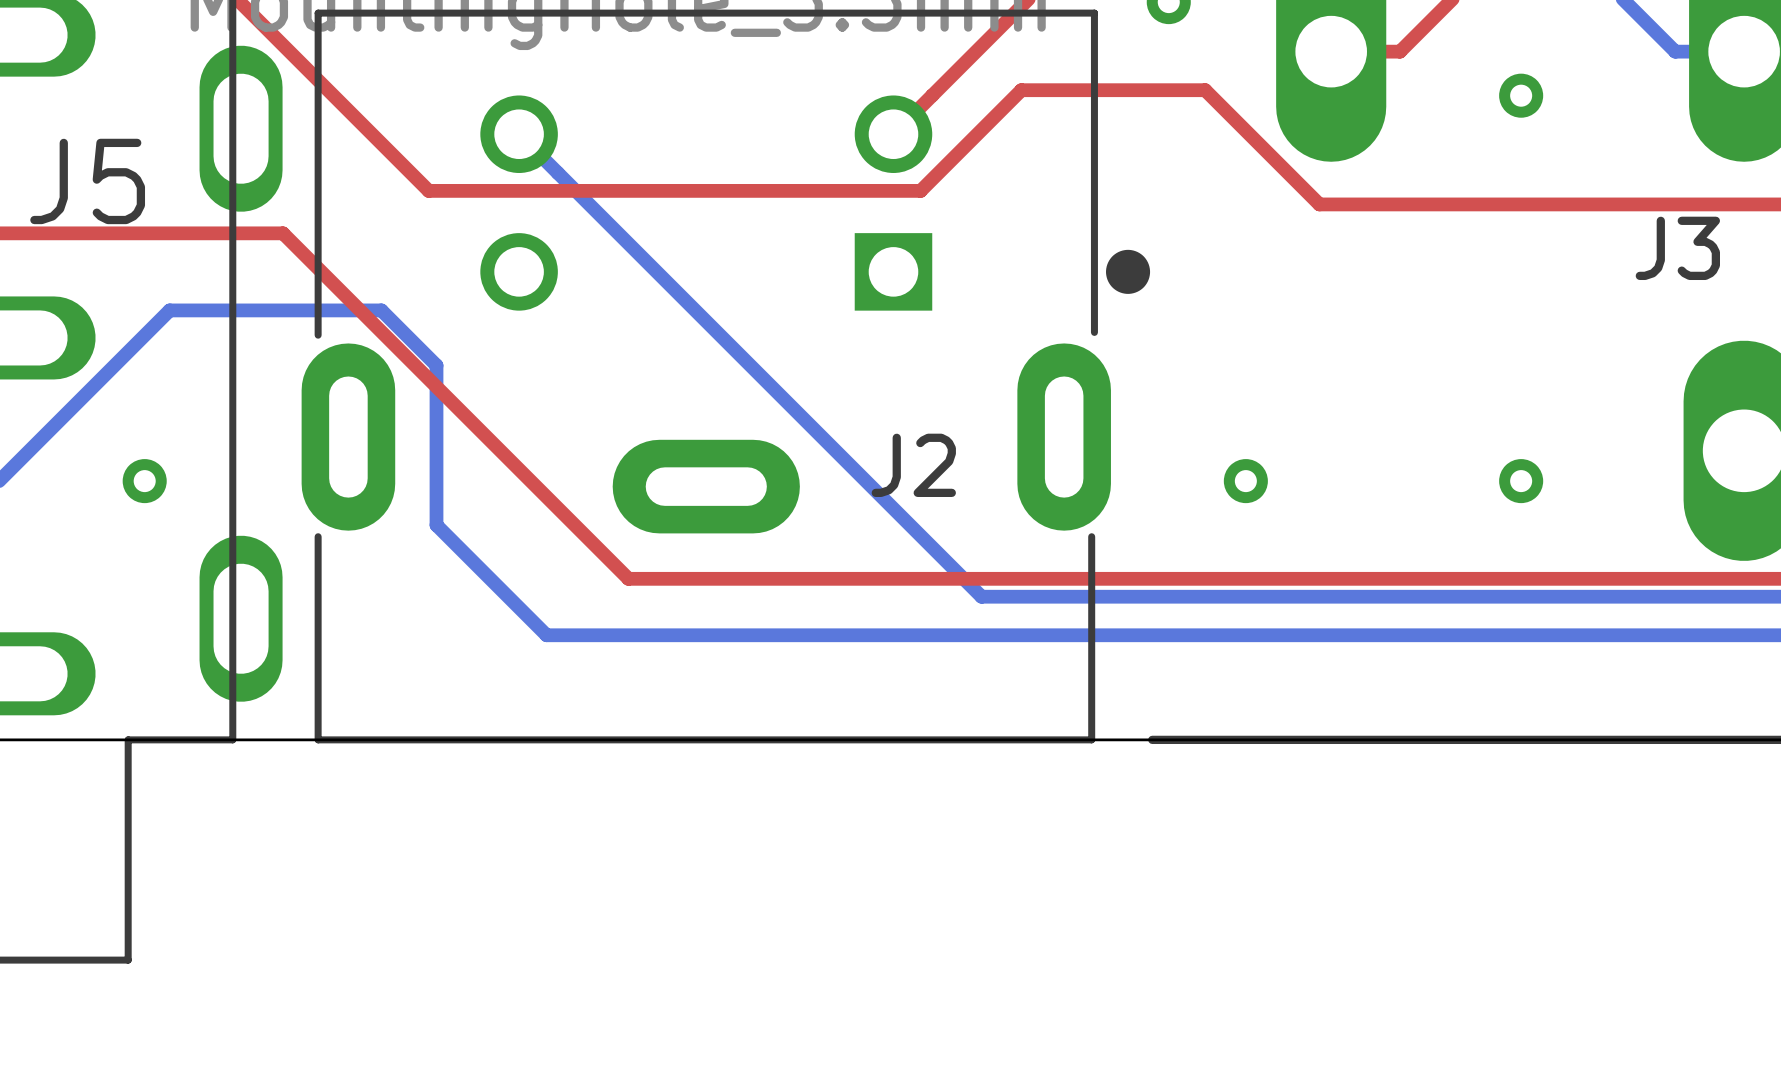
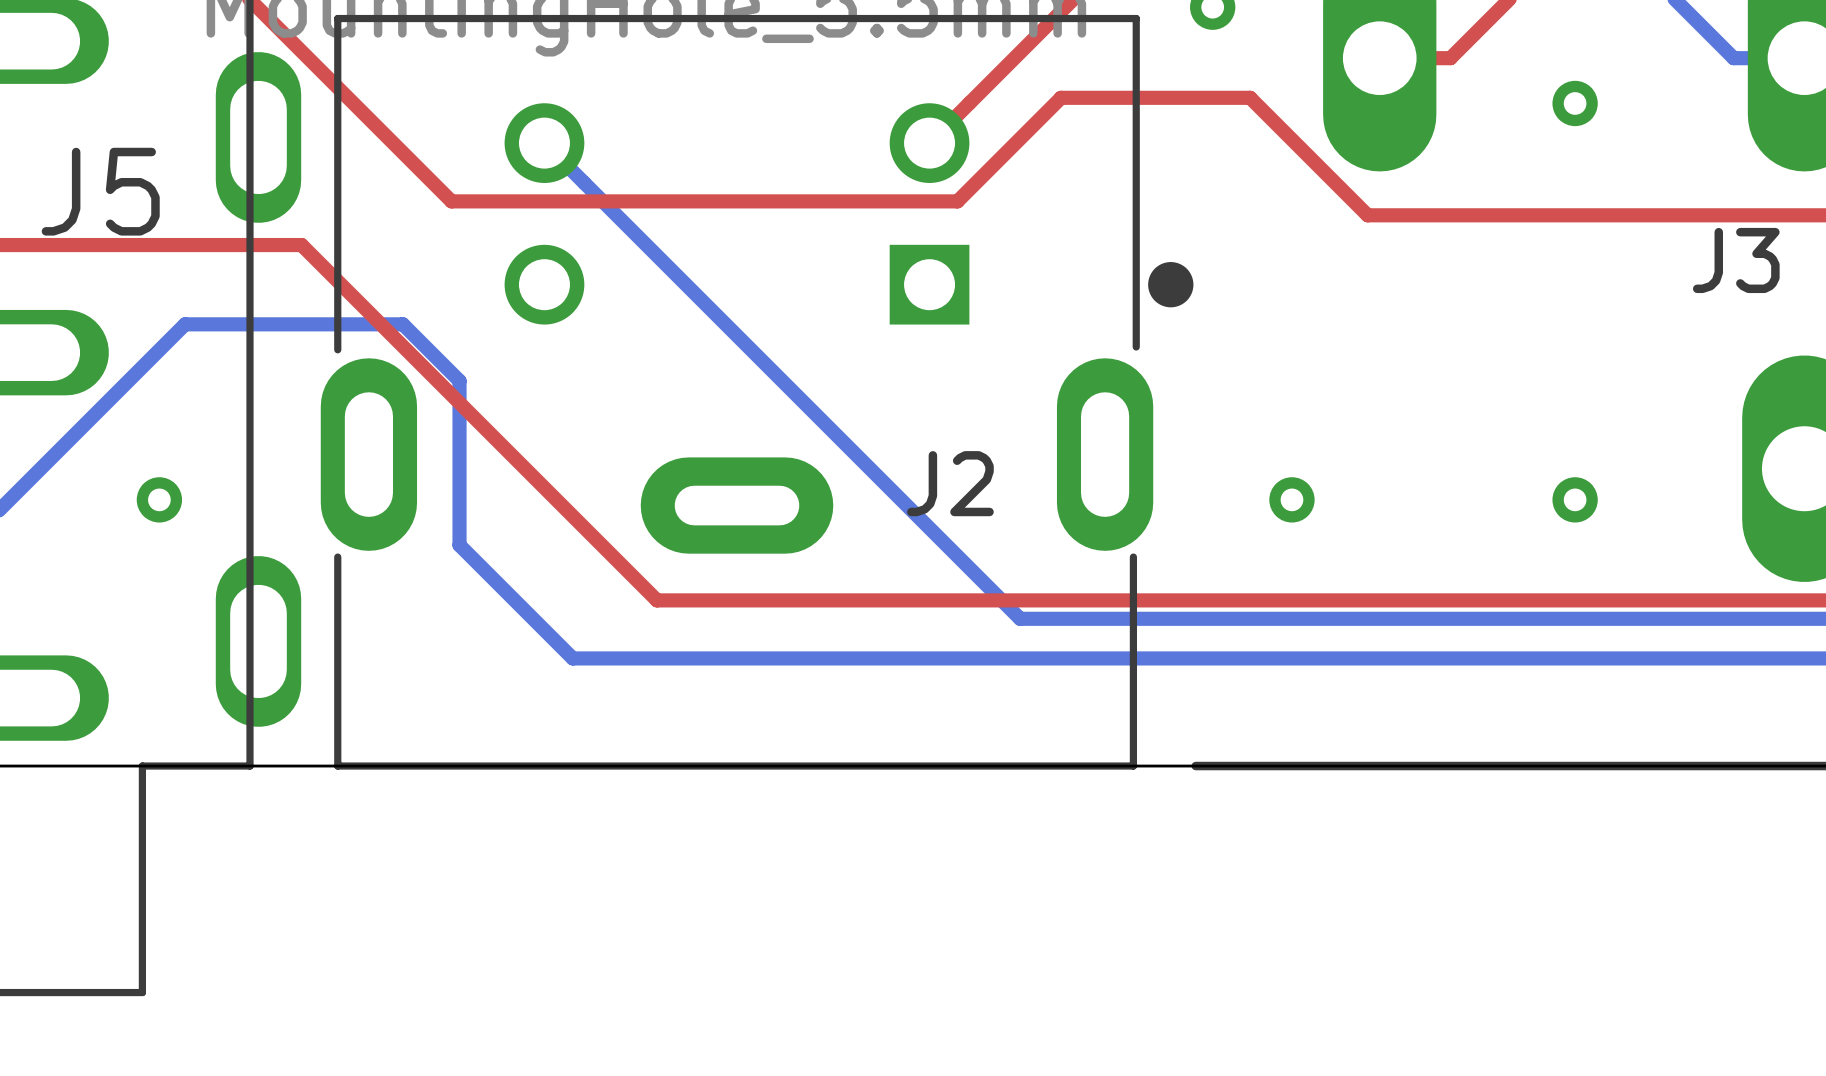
J2 footprint: [301, 9, 1151, 744] -> [320, 14, 1194, 770]

